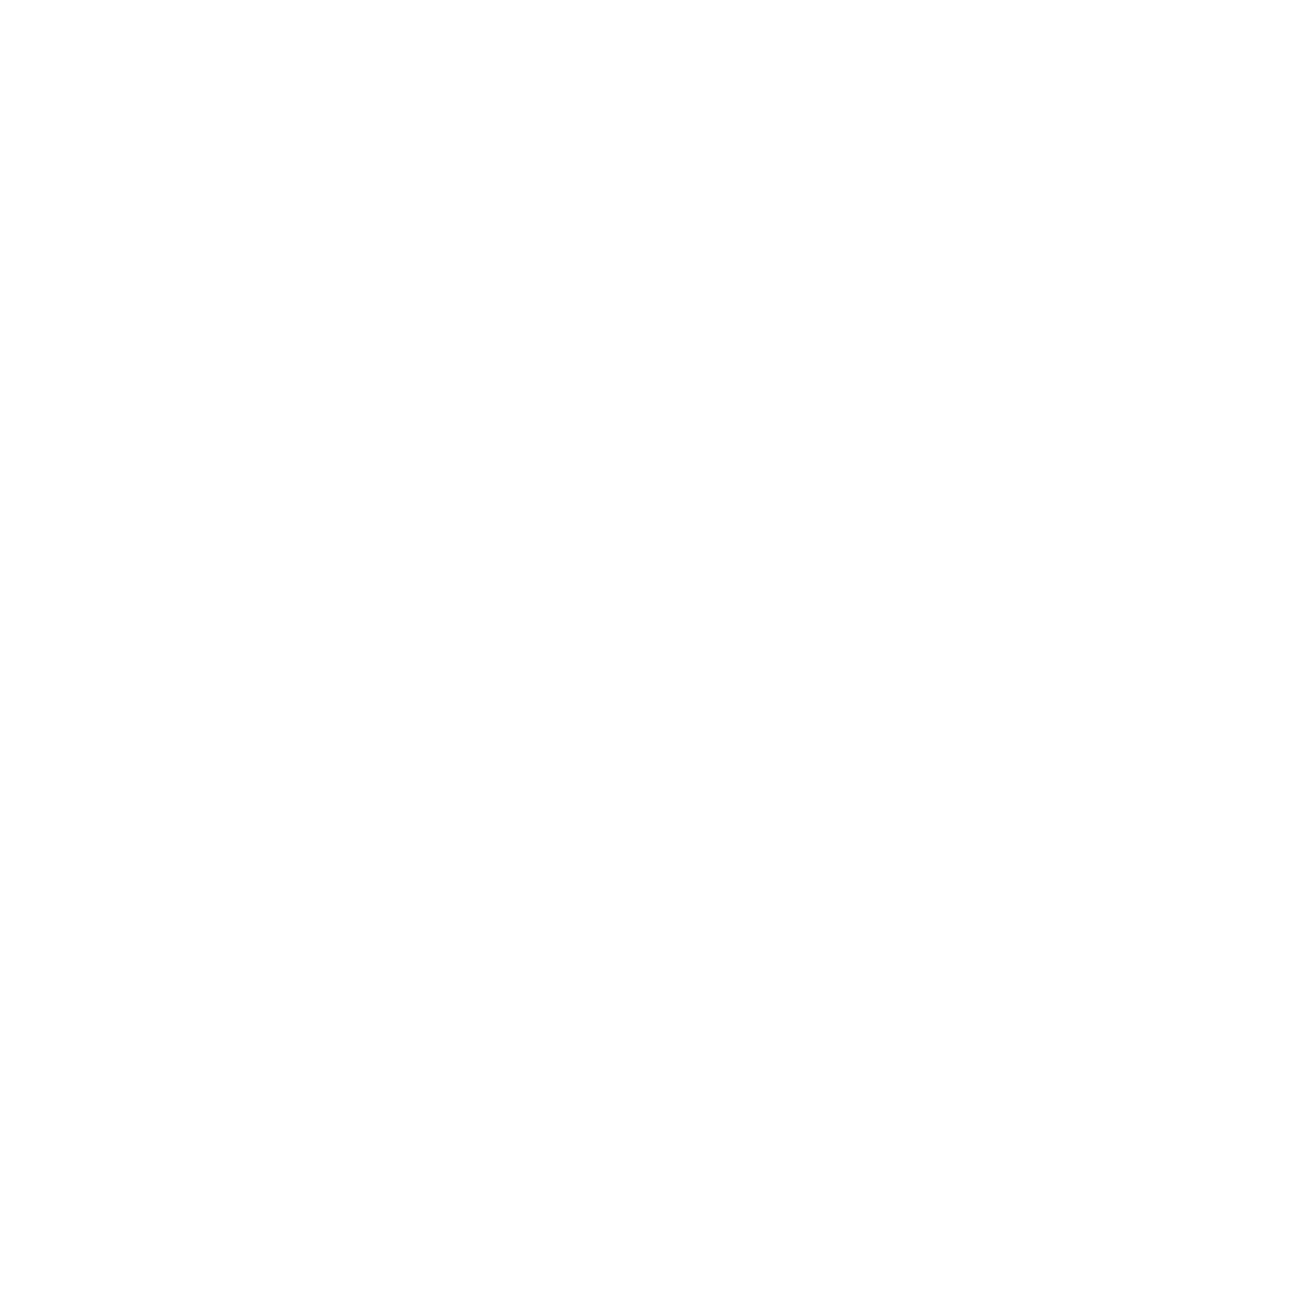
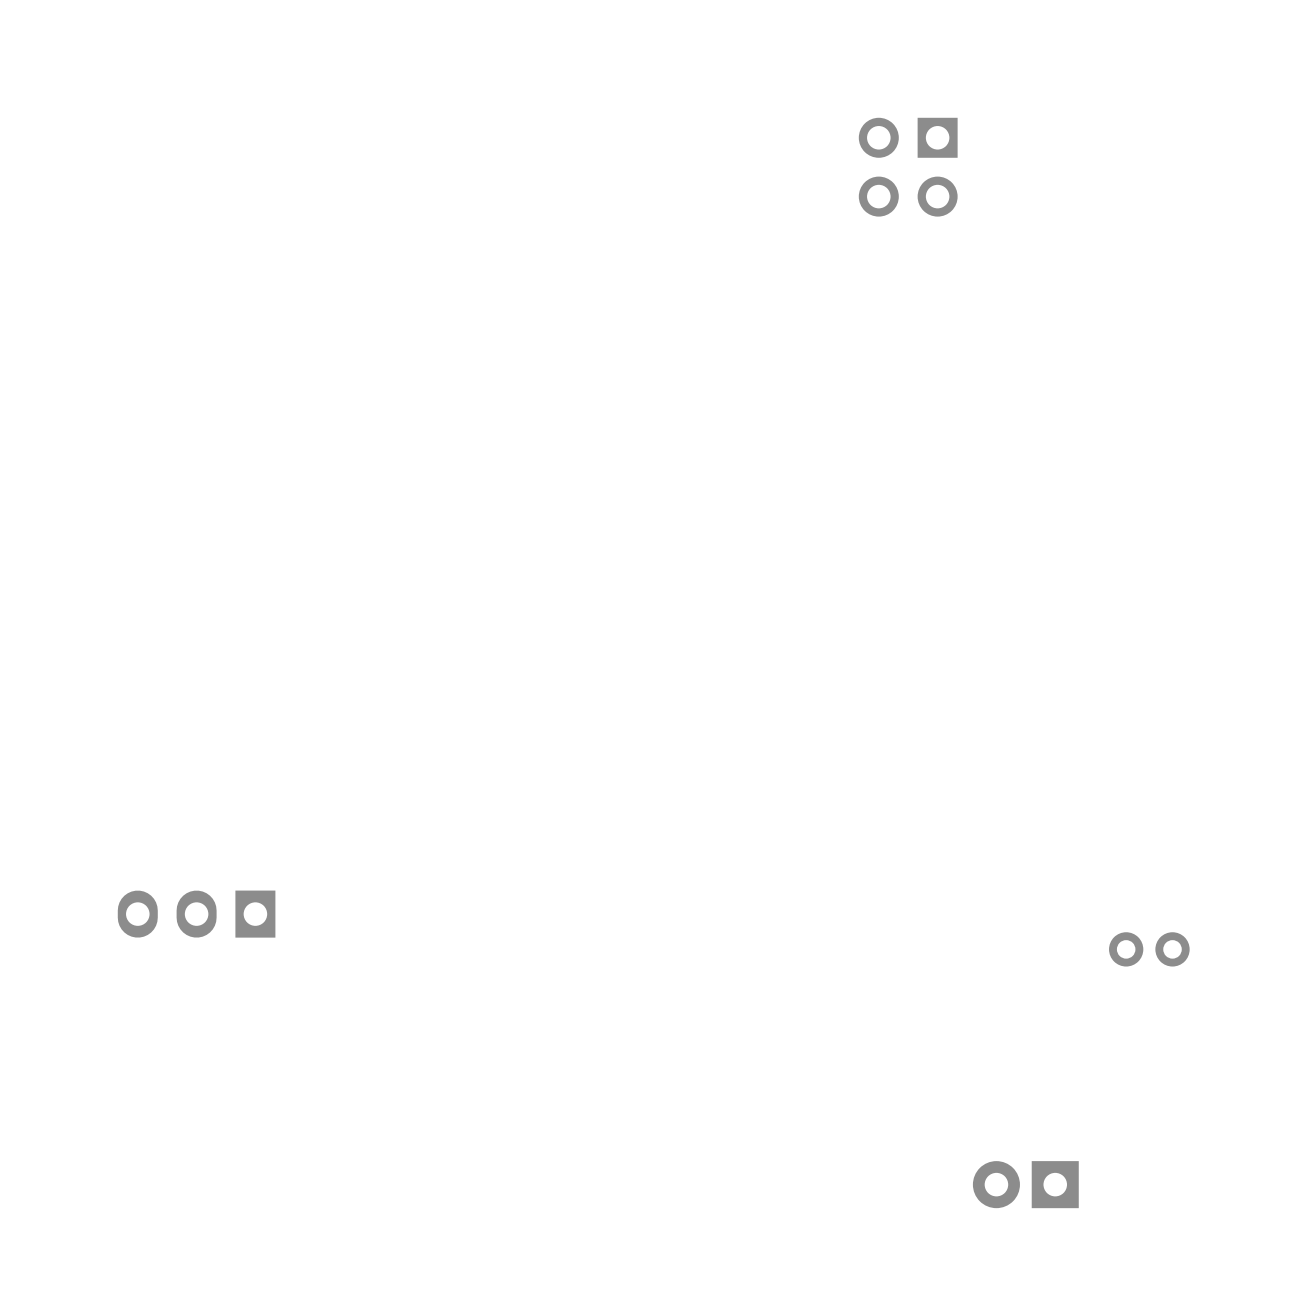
part: none -> (908, 167)
part: none -> (196, 914)
part: none -> (1149, 949)
part: none -> (1025, 1184)

